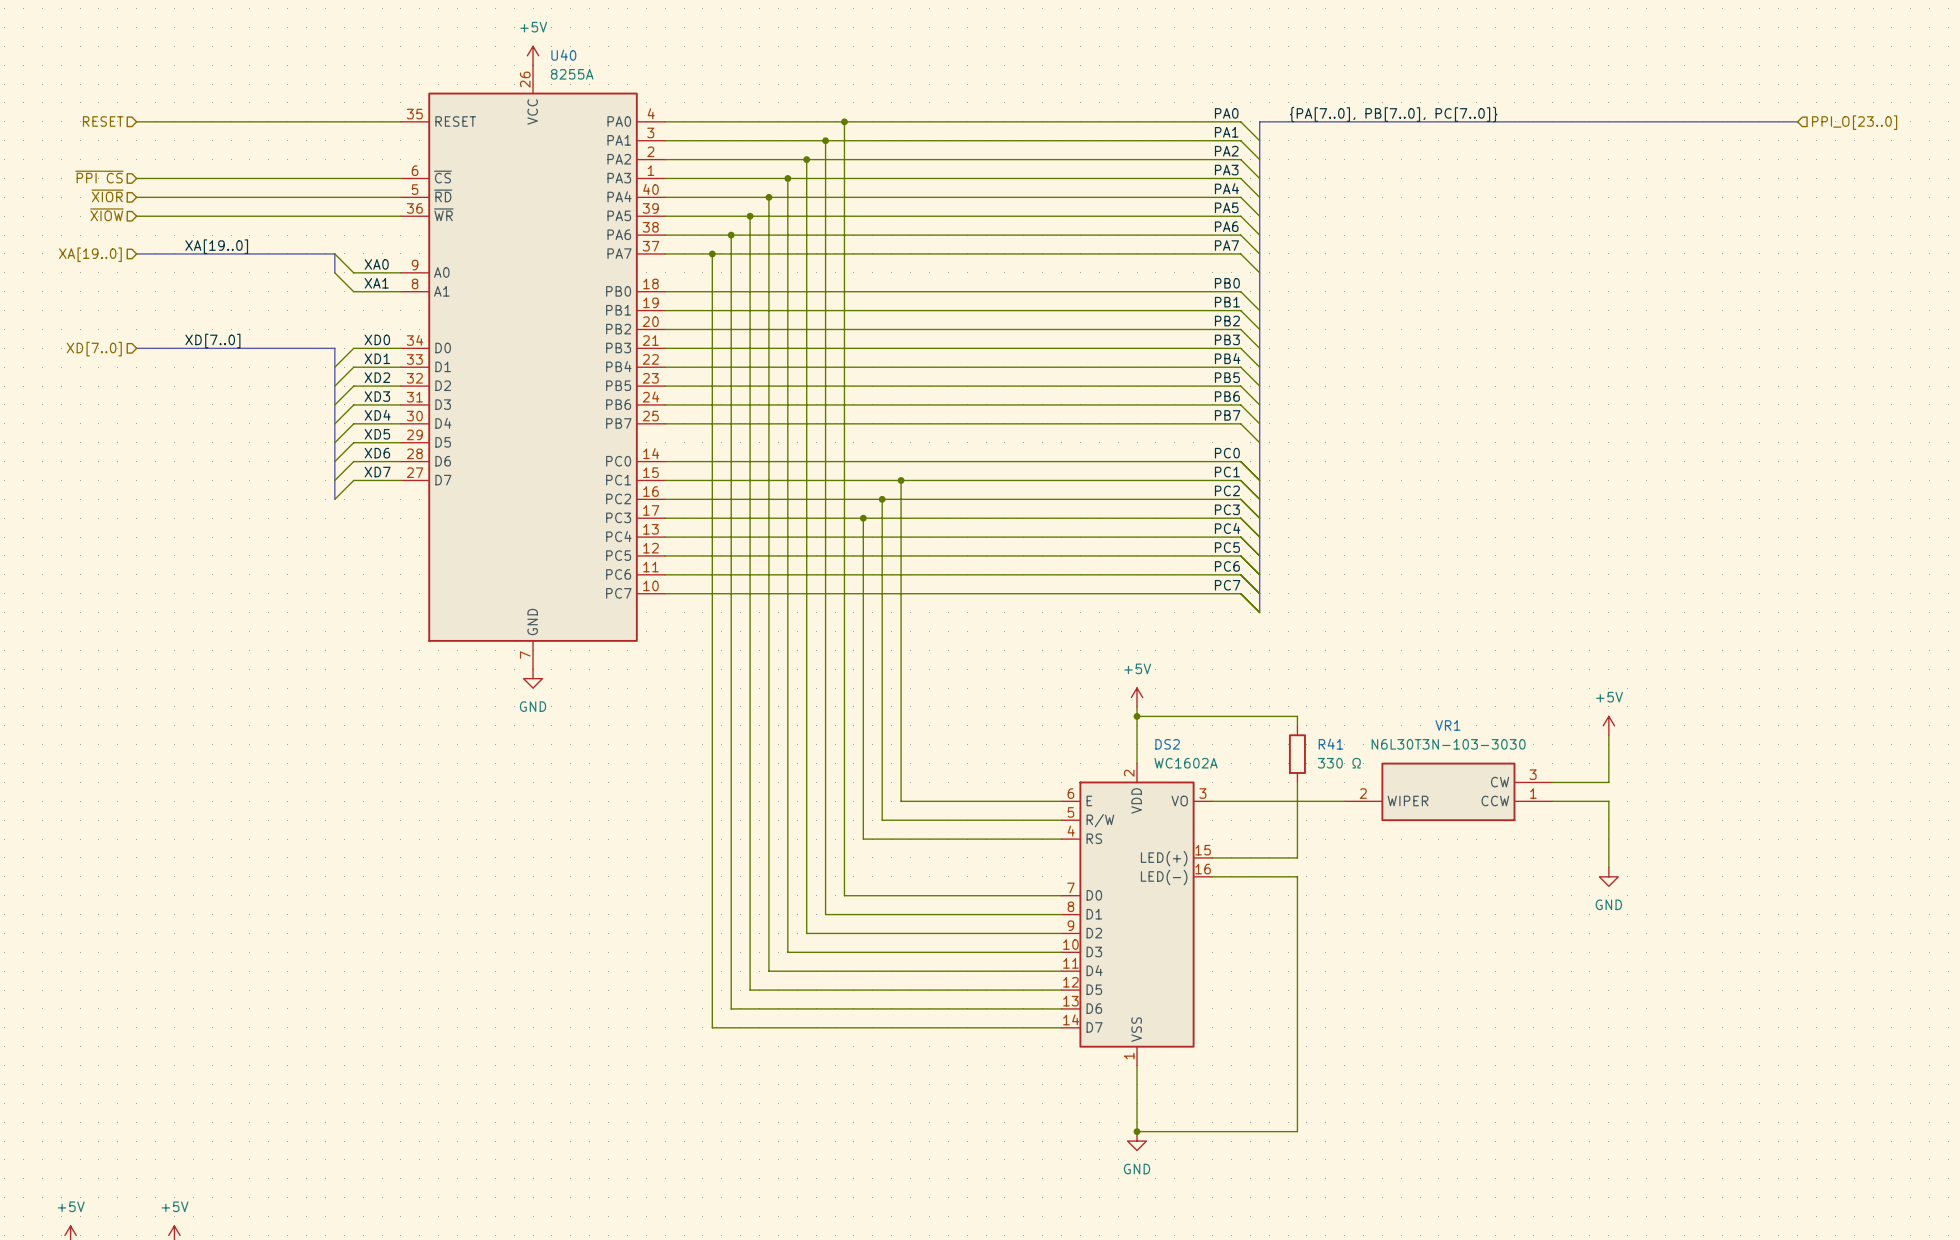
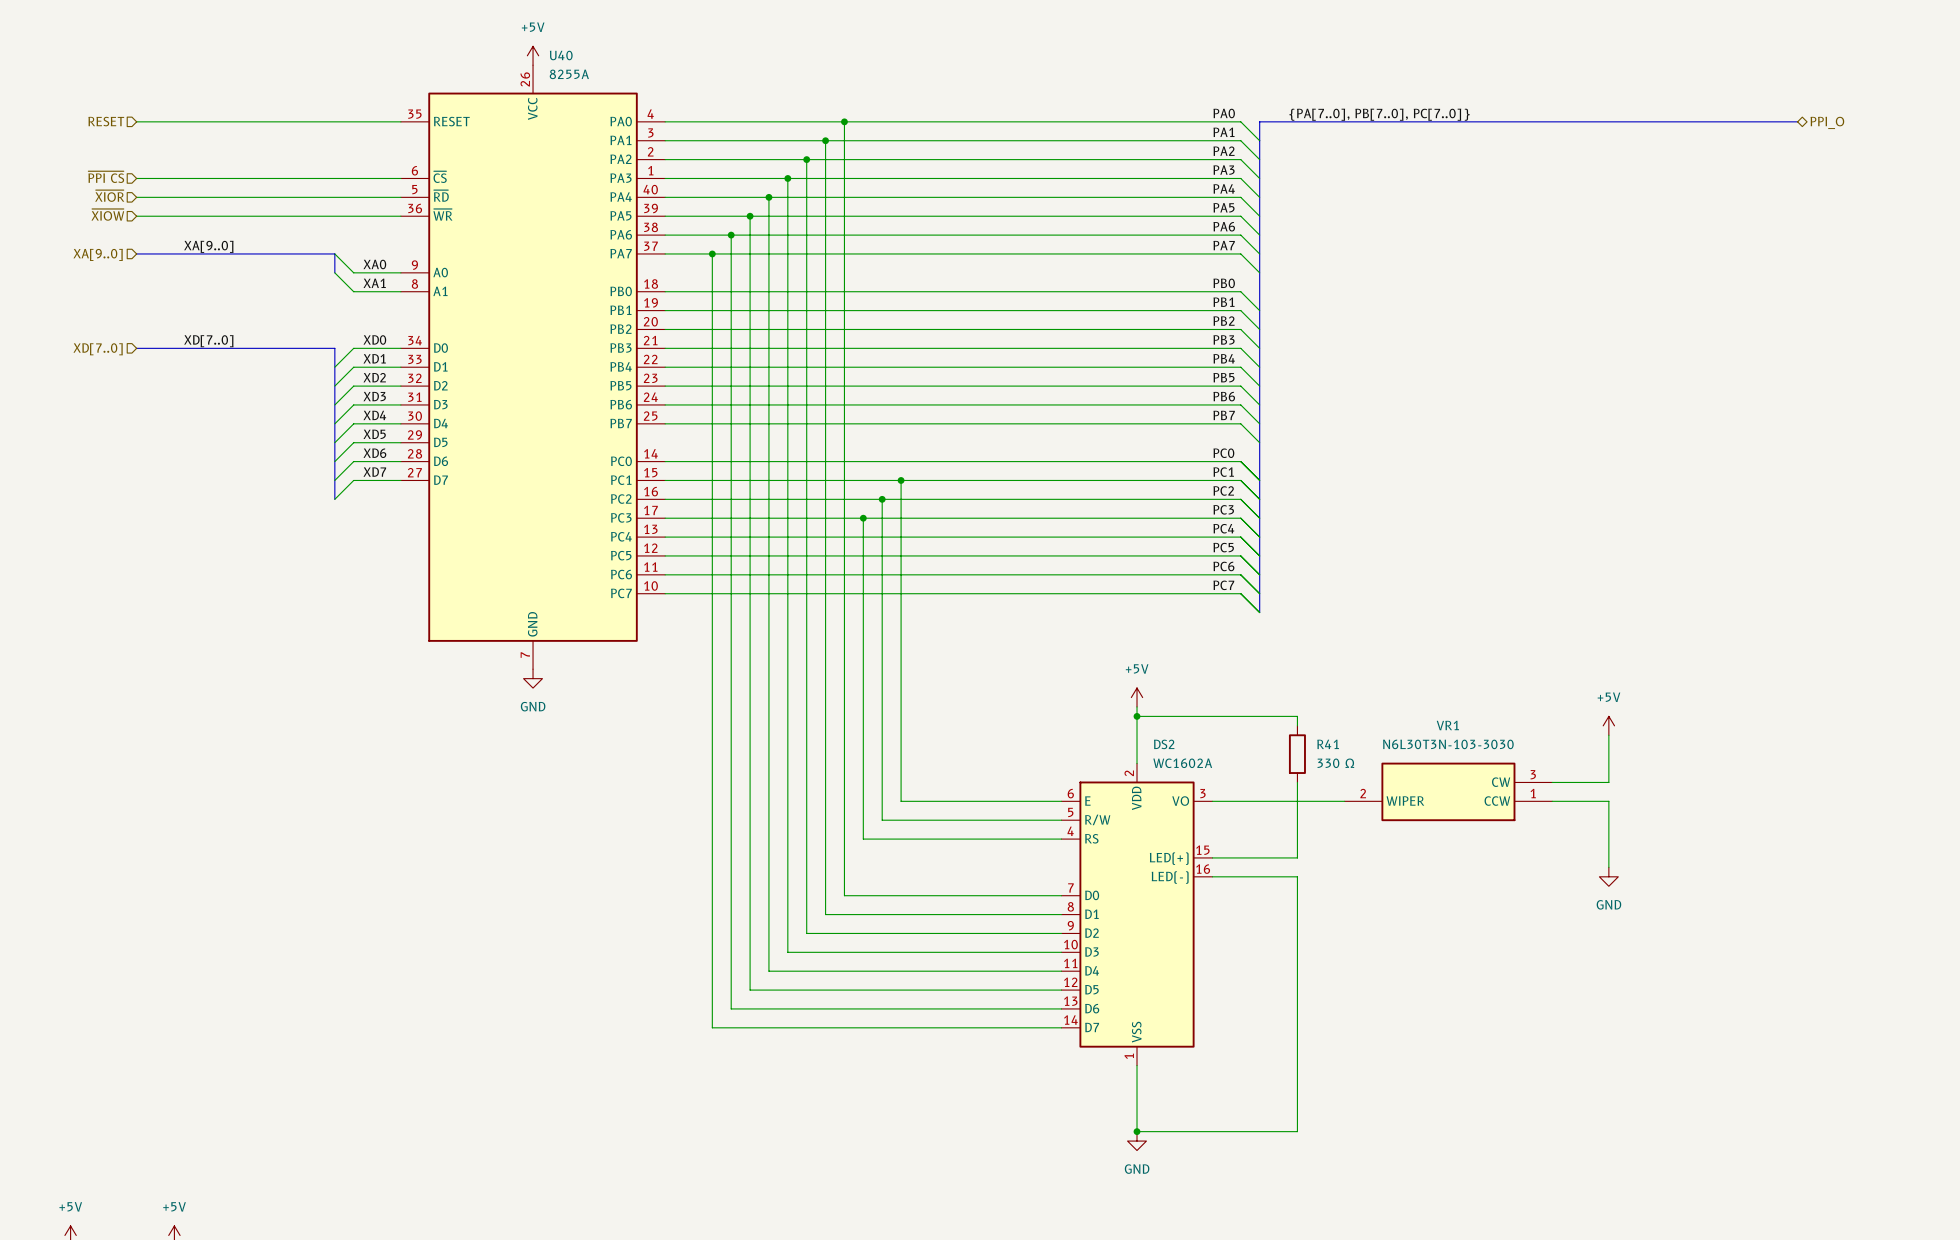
hierarchical label shape: input (1854, 122) -> bidirectional (1827, 122)
hierarchical label: PPI_O[23..0] (1854, 122) -> PPI_O (1827, 122)
label: XA[19..0] (216, 246) -> XA[9..0] (208, 246)
hierarchical label: XA[19..0] (90, 254) -> XA[9..0] (98, 254)

